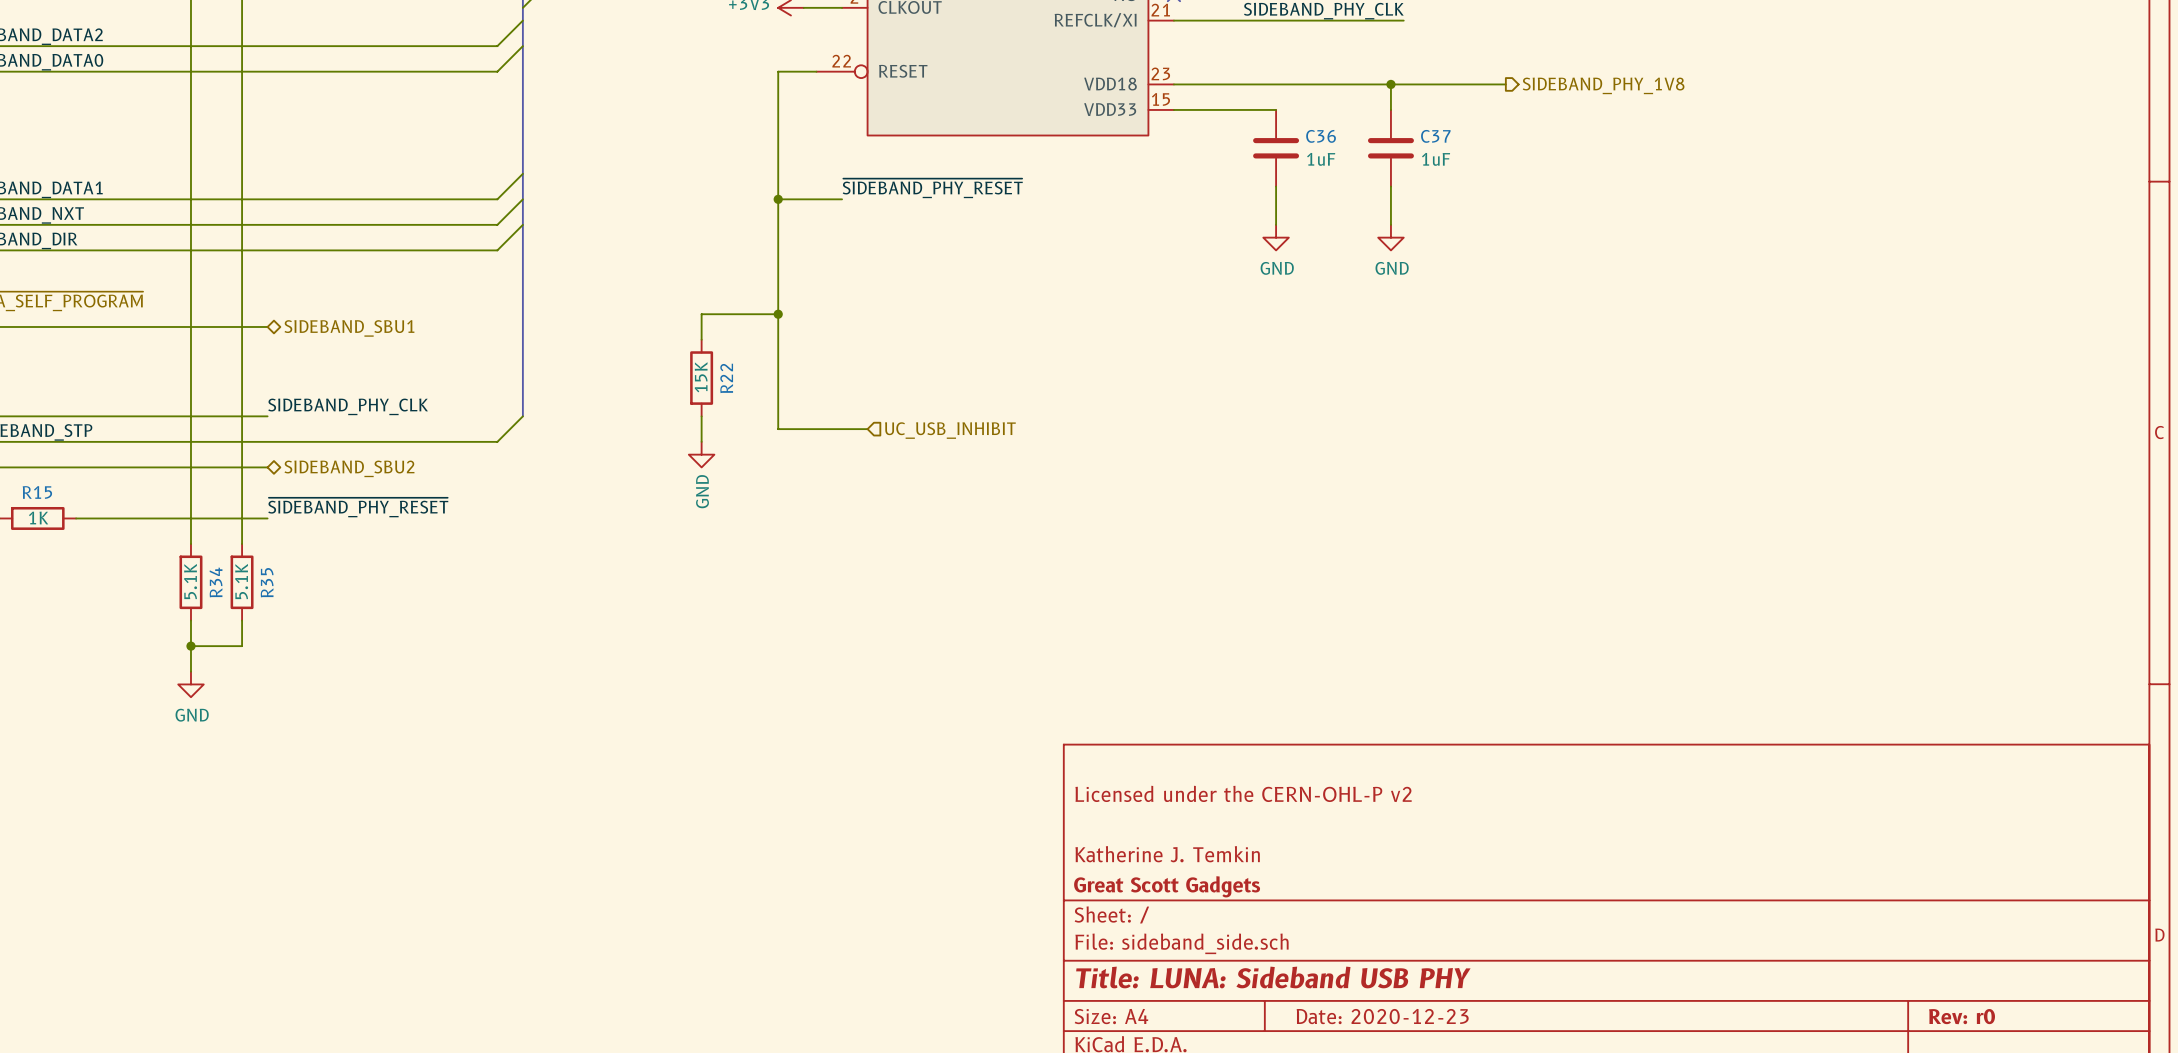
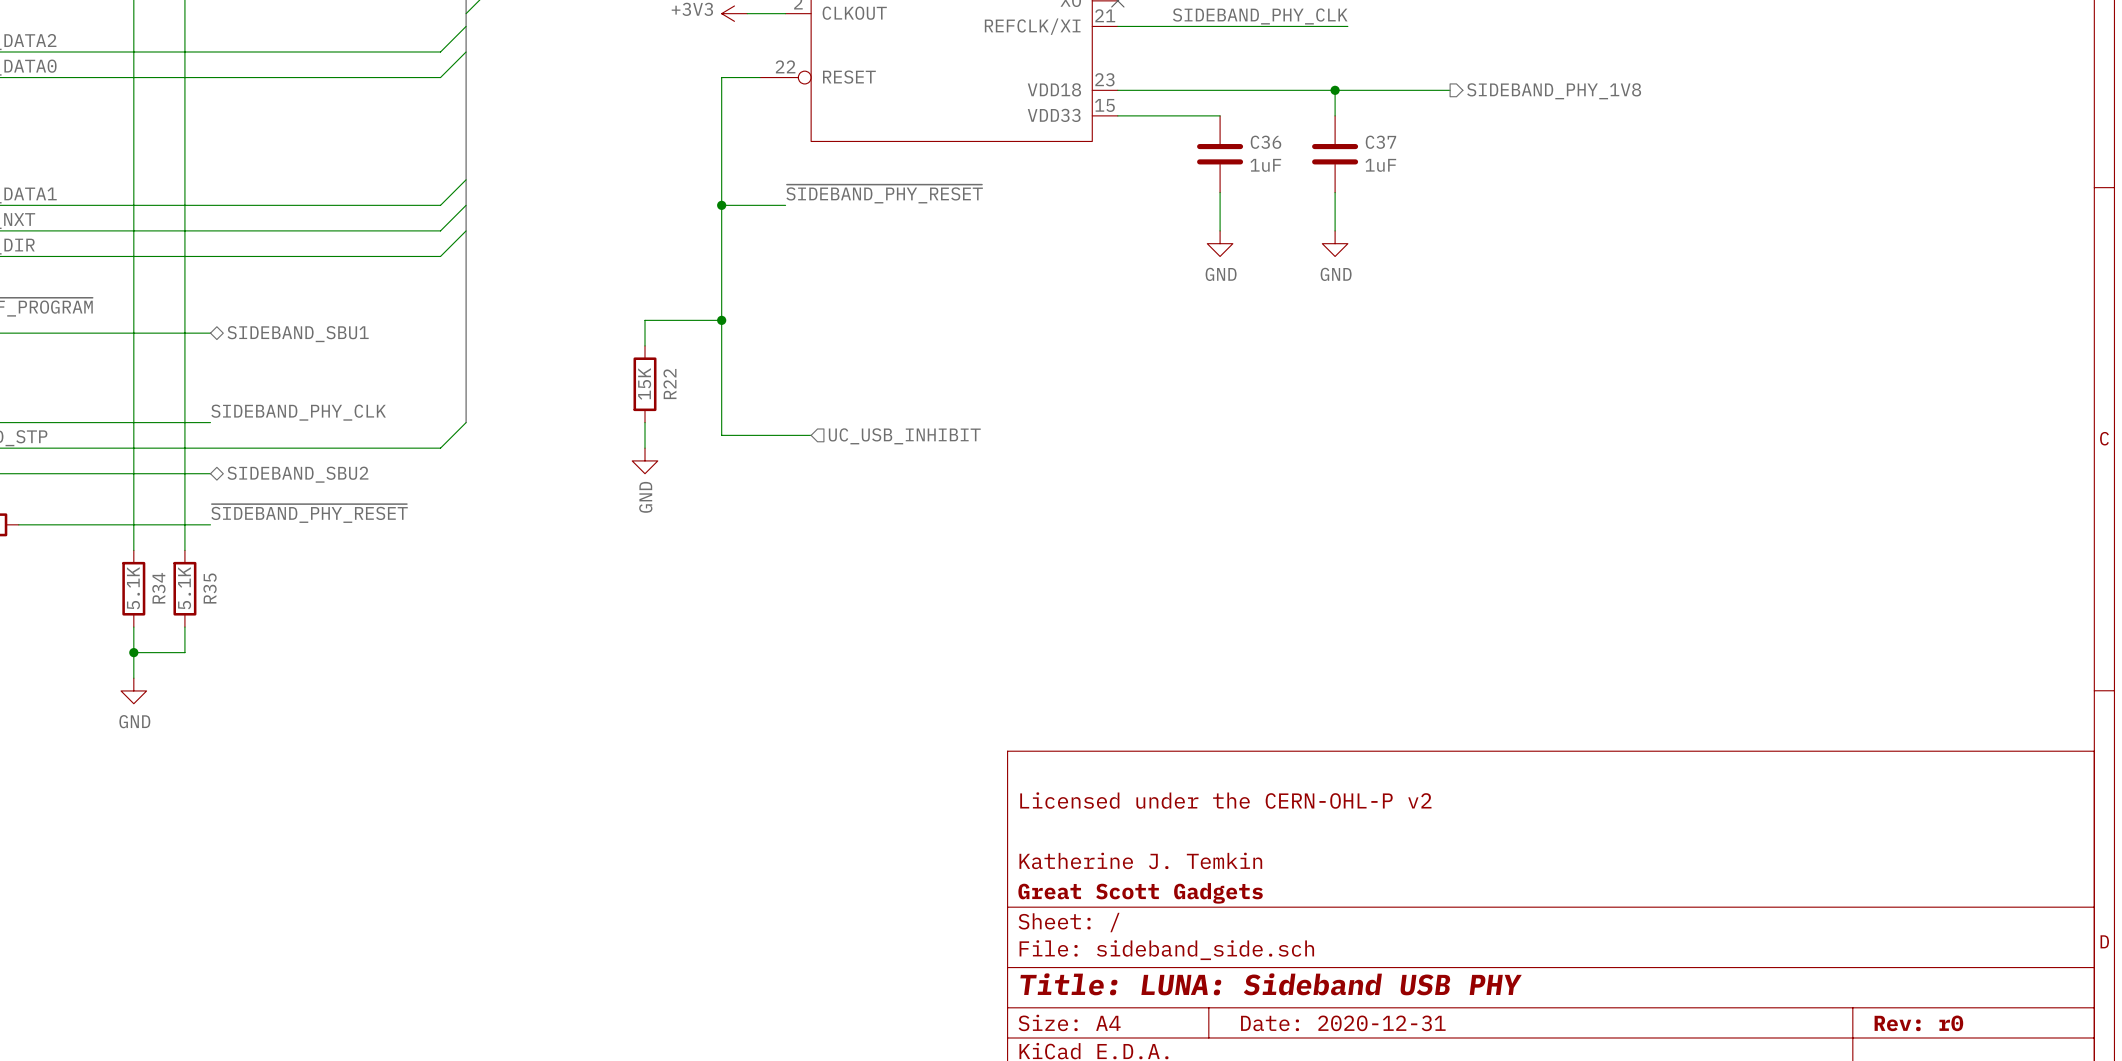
title block: Date: 2020-12-23 (1382, 1016) -> Date: 2020-12-31 (1343, 1023)

